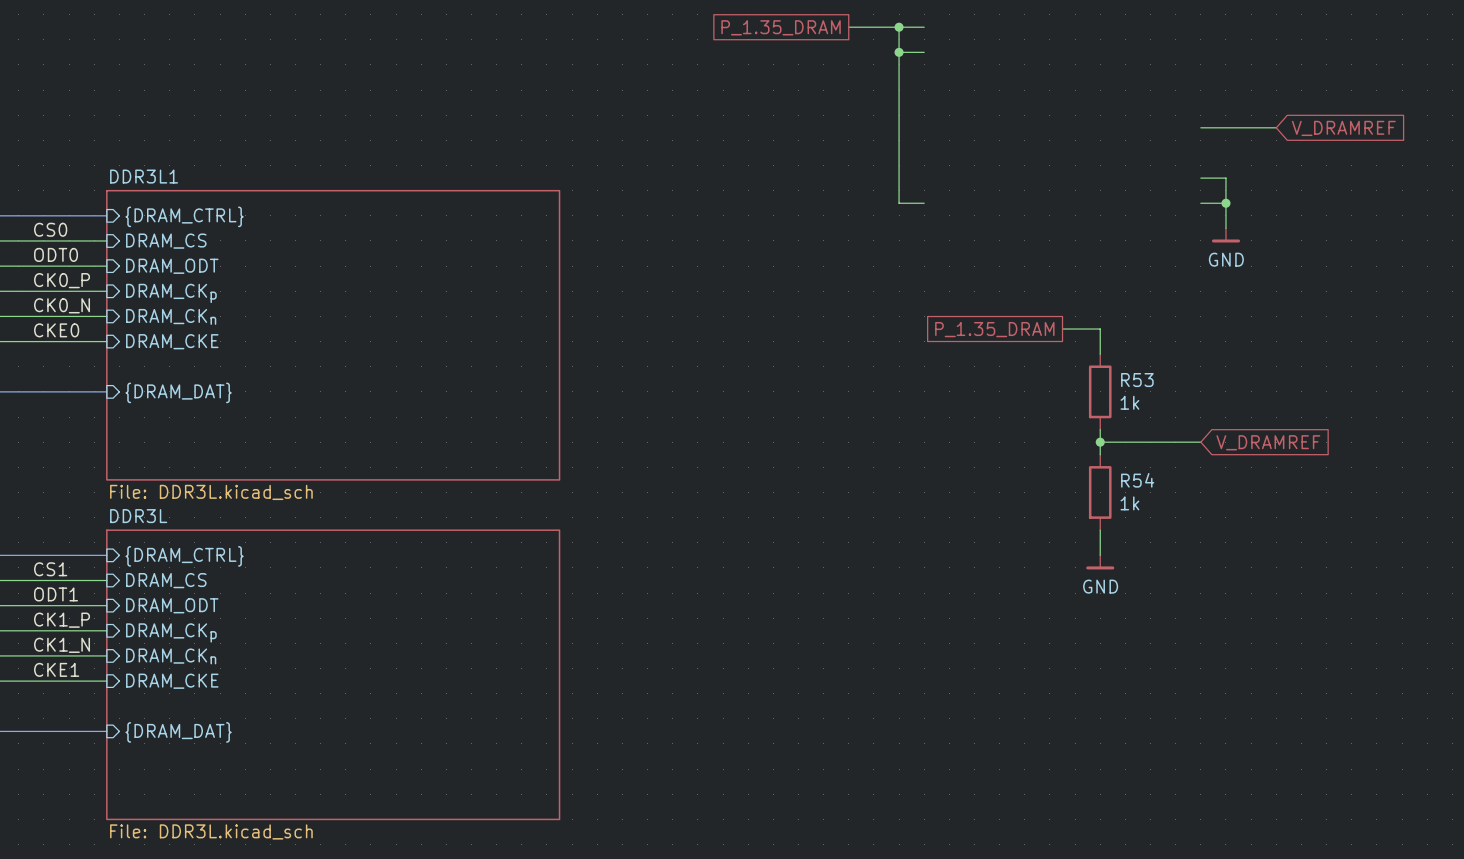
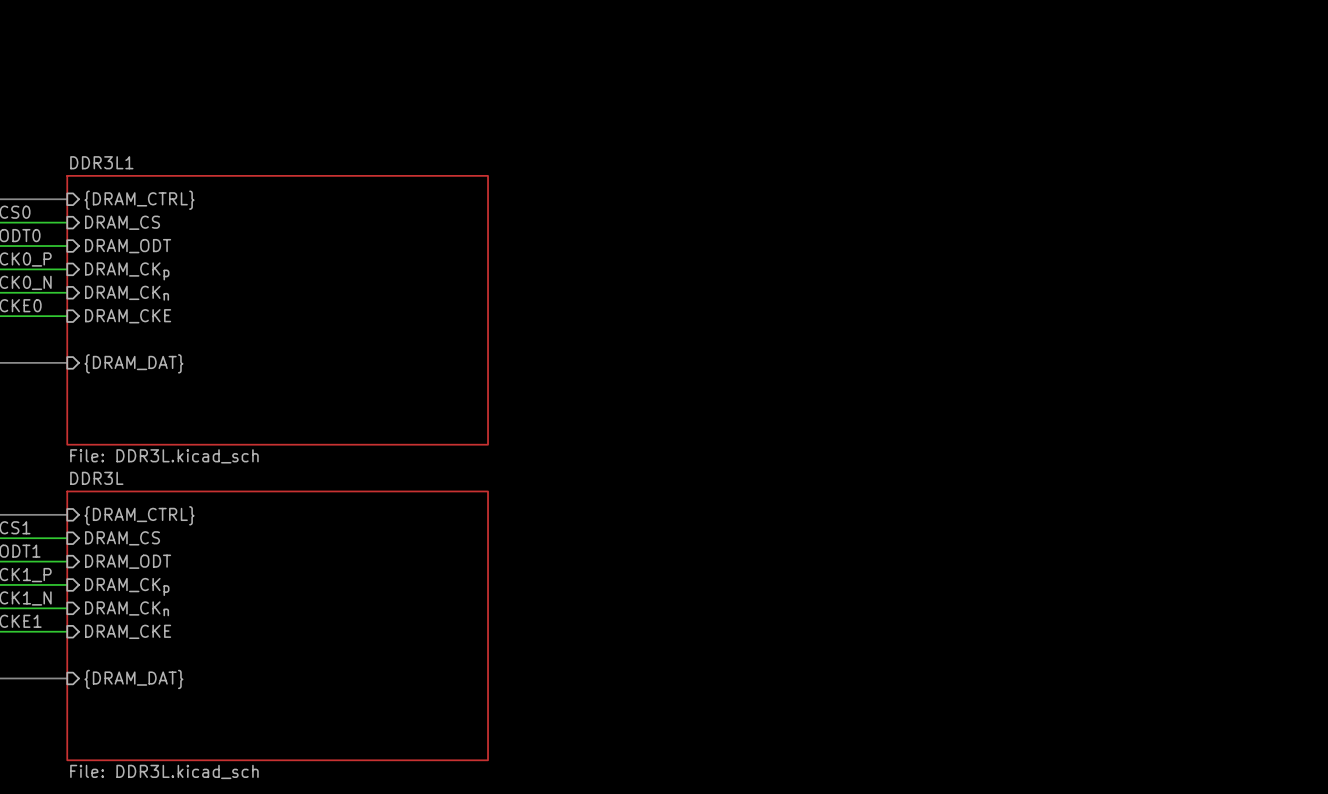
global label: P_1.35_DRAM (781, 27) -> none
wire: (848, 27) (924, 27) -> none
wire: (899, 27) (899, 203) (924, 203) -> none
junction: (899, 27) -> none
wire: (899, 52) (924, 52) -> none
junction: (899, 52) -> none
wire: (1200, 127) (1276, 127) -> none
global label: V_DRAMREF (1343, 128) -> none
wire: (1200, 178) (1225, 178) (1225, 228) -> none
wire: (1200, 203) (1225, 203) -> none
junction: (1225, 203) -> none
power symbol: GND (1225, 235) -> none
global label: P_1.35_DRAM (994, 329) -> none
wire: (1062, 329) (1100, 329) (1100, 354) -> none
R53: 1k (1100, 391) -> none
wire: (1100, 429) (1100, 454) -> none
wire: (1100, 442) (1200, 442) -> none
junction: (1100, 442) -> none
global label: V_DRAMREF (1268, 442) -> none
R54: 1k (1100, 492) -> none
wire: (1100, 530) (1100, 555) -> none
power symbol: GND (1100, 562) -> none

